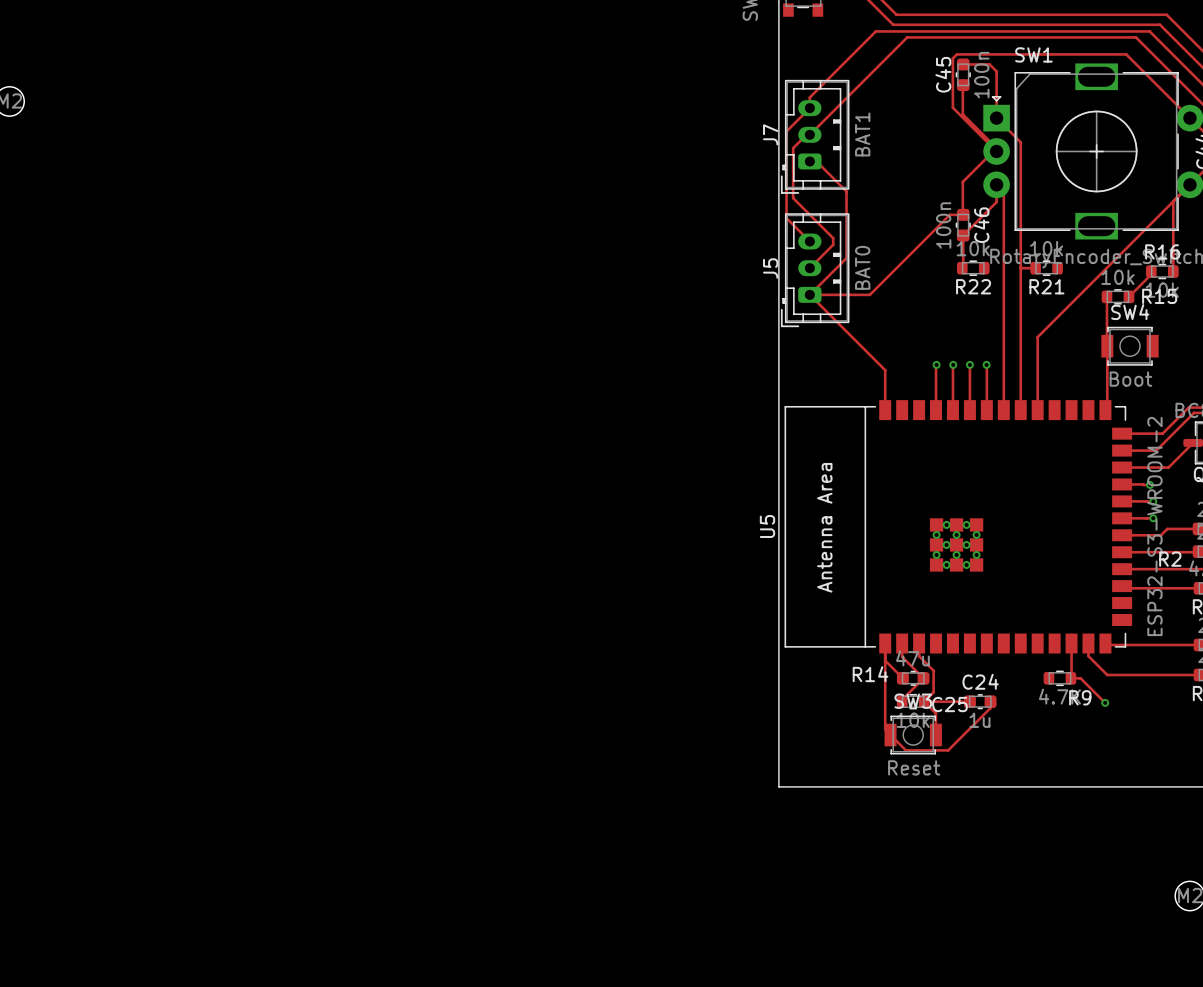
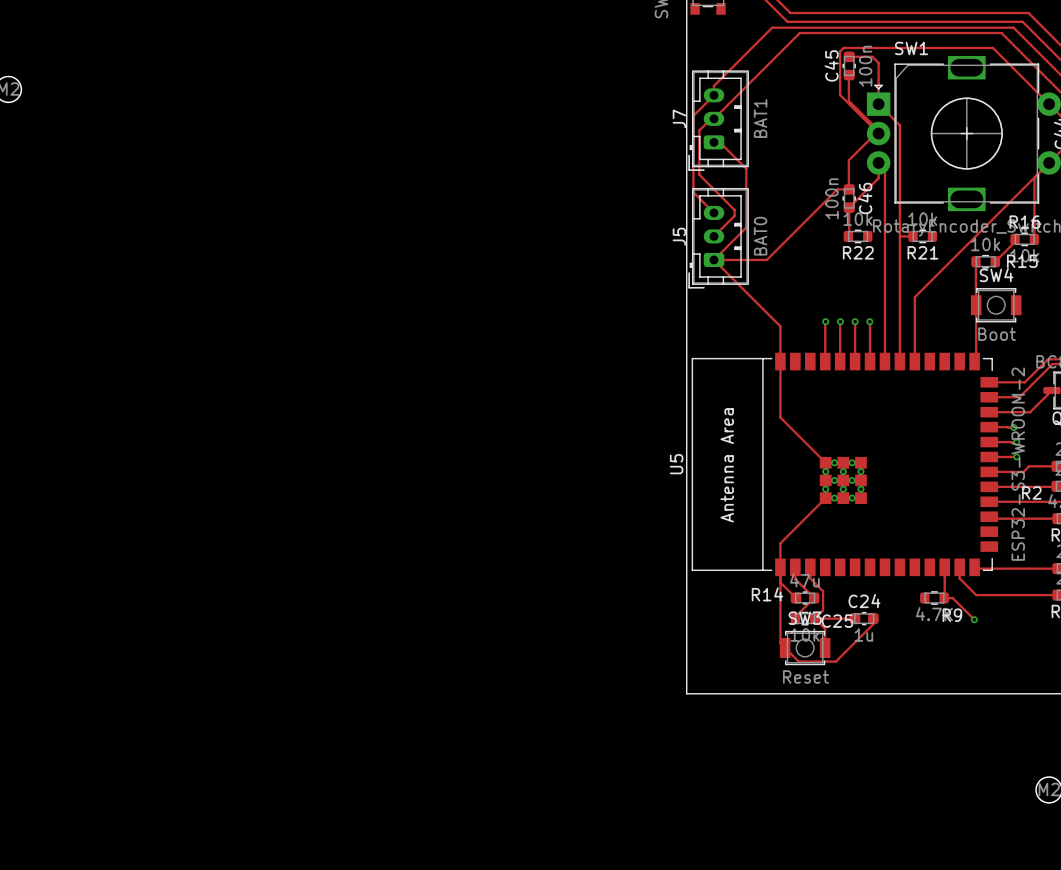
track: none -> (780, 361) (780, 417) (825, 462)
track: none -> (825, 498) (780, 543) (780, 567)

